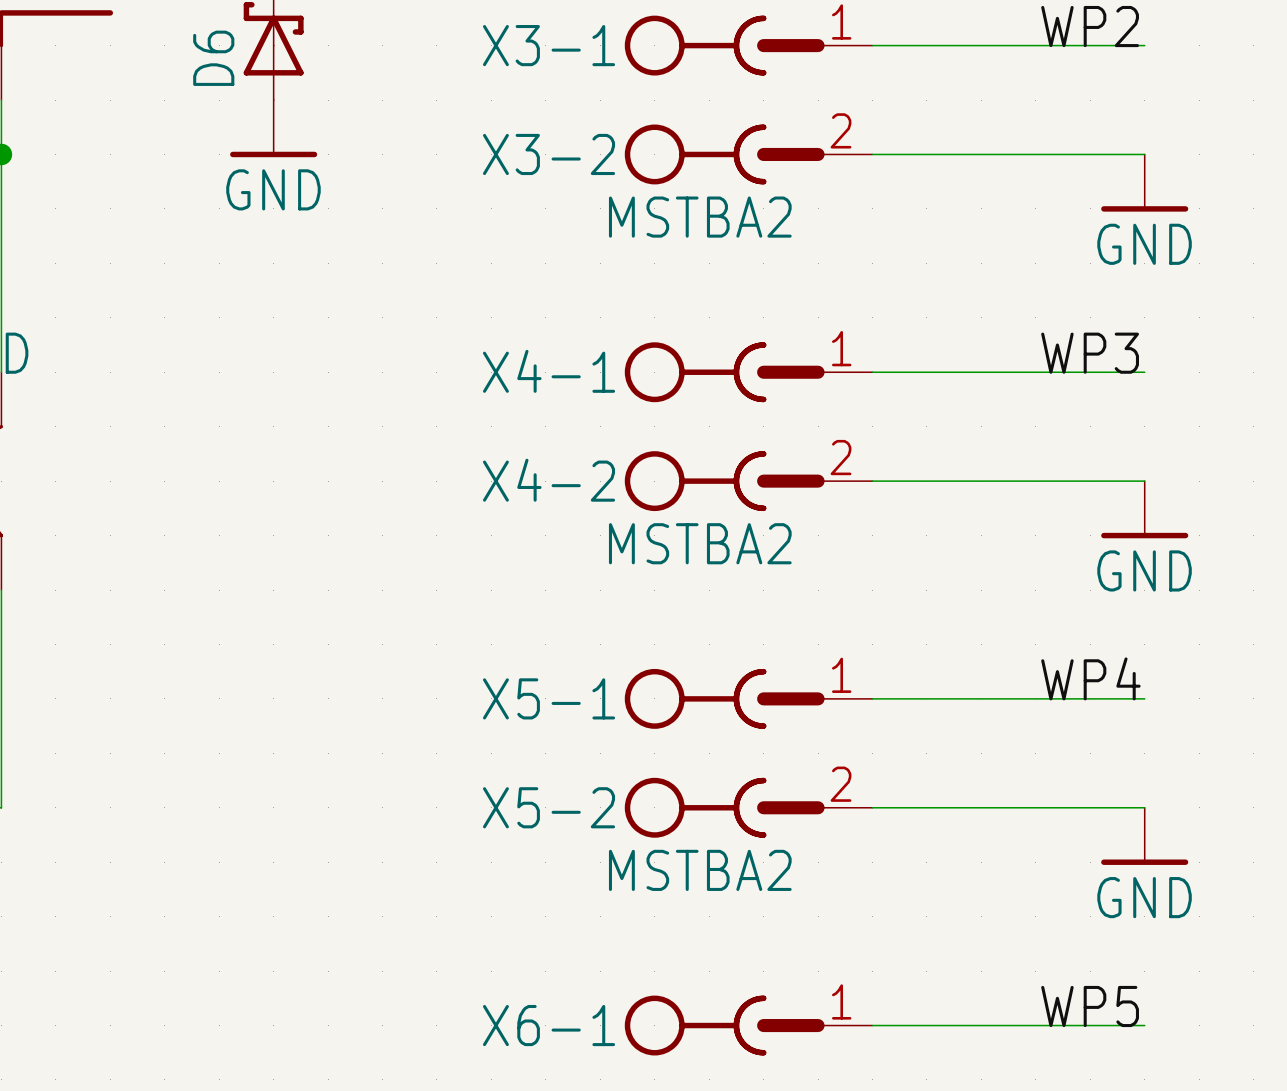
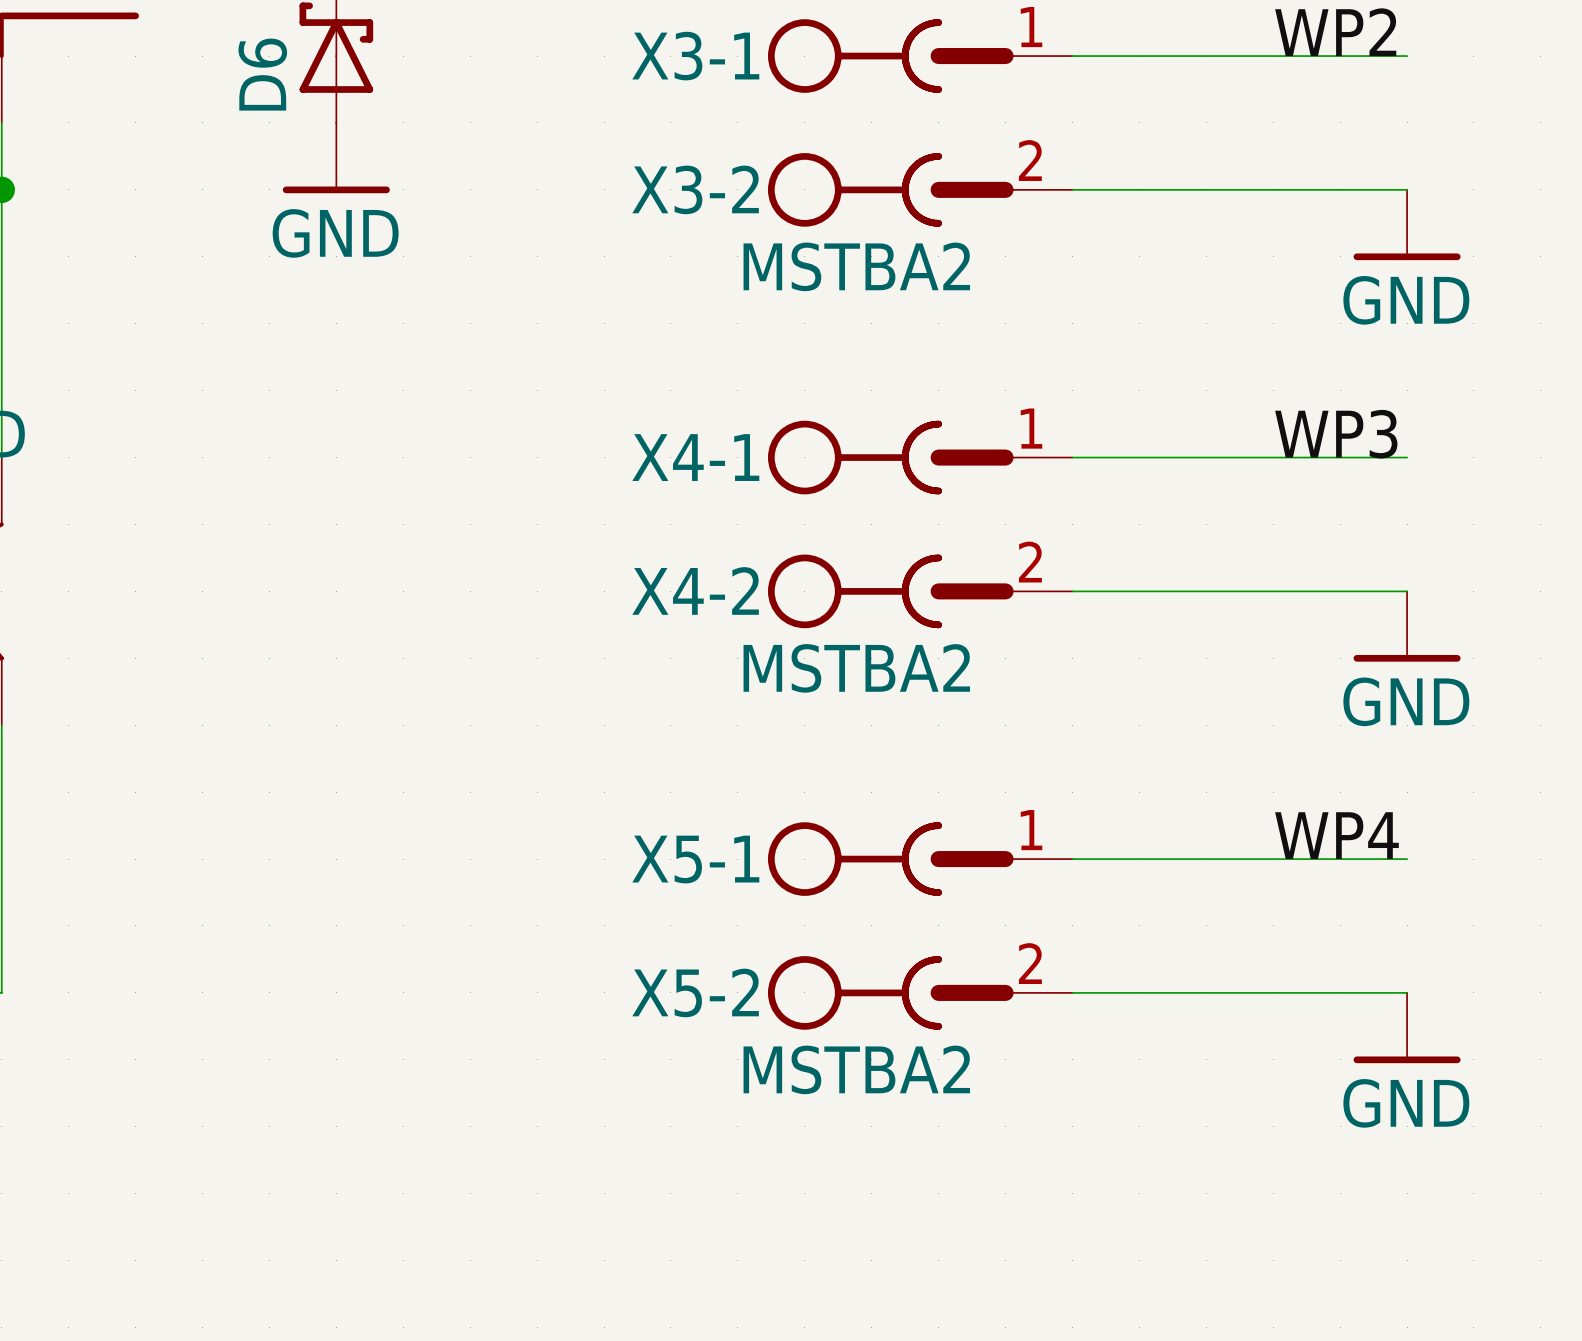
label: WP5 (1090, 1006) -> none
X6-1: (748, 1025) -> none
wire: (872, 1025) (1144, 1025) -> none

